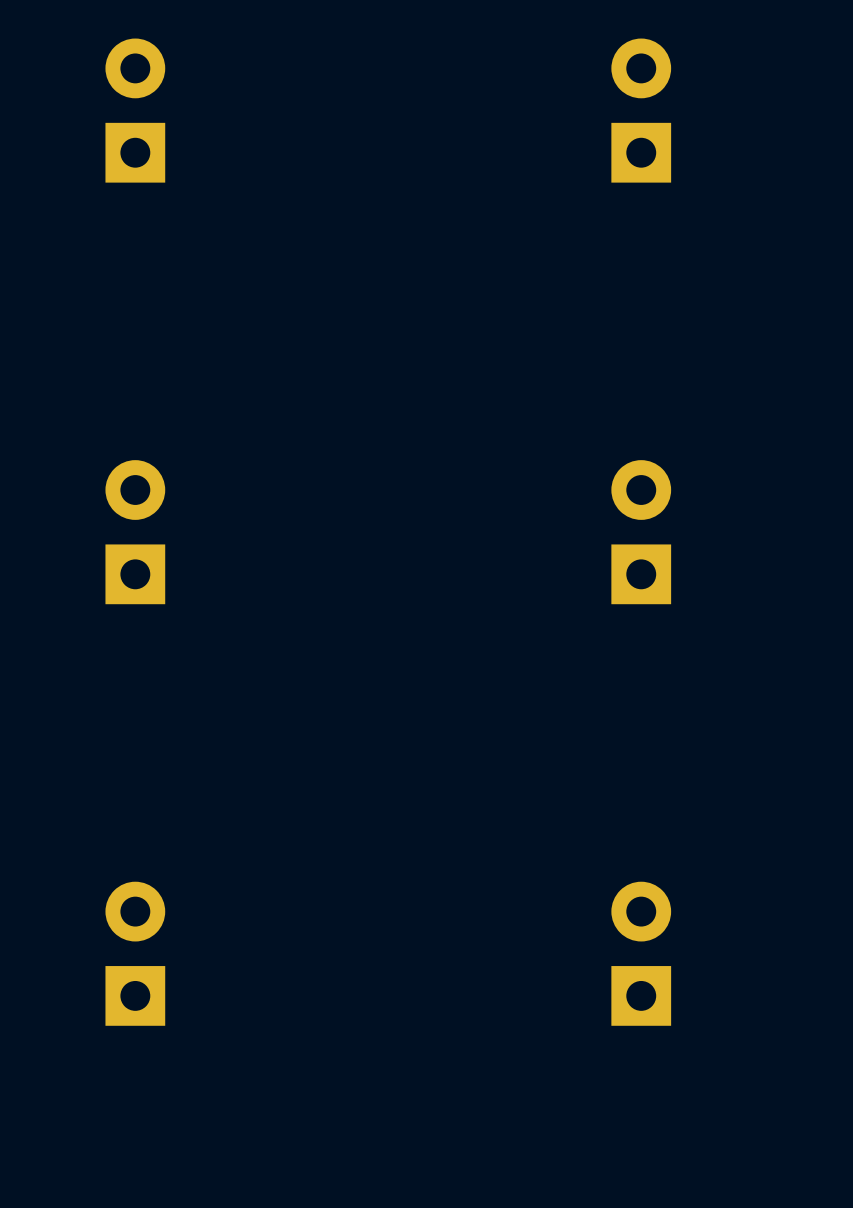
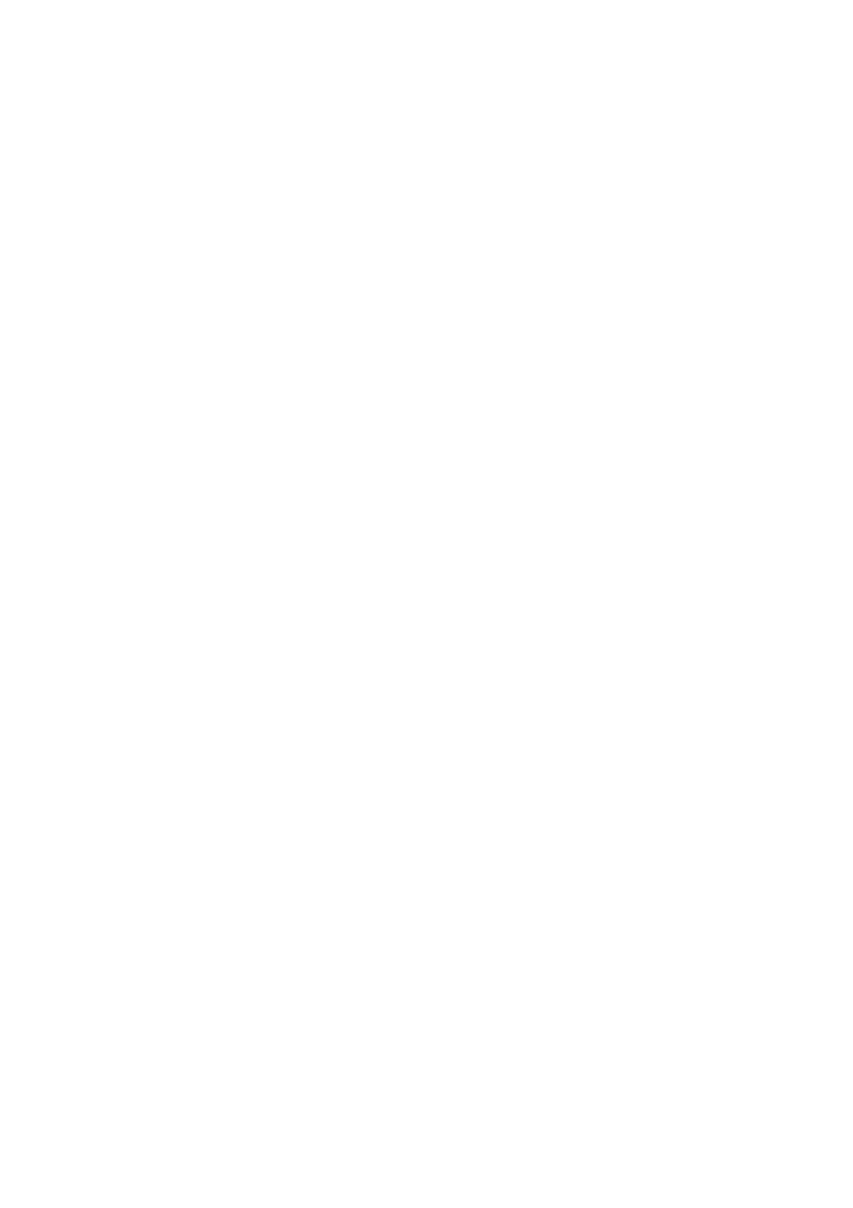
part: (135, 110) -> none
part: (641, 110) -> none
part: (135, 532) -> none
part: (641, 532) -> none
part: (135, 953) -> none
part: (641, 953) -> none

